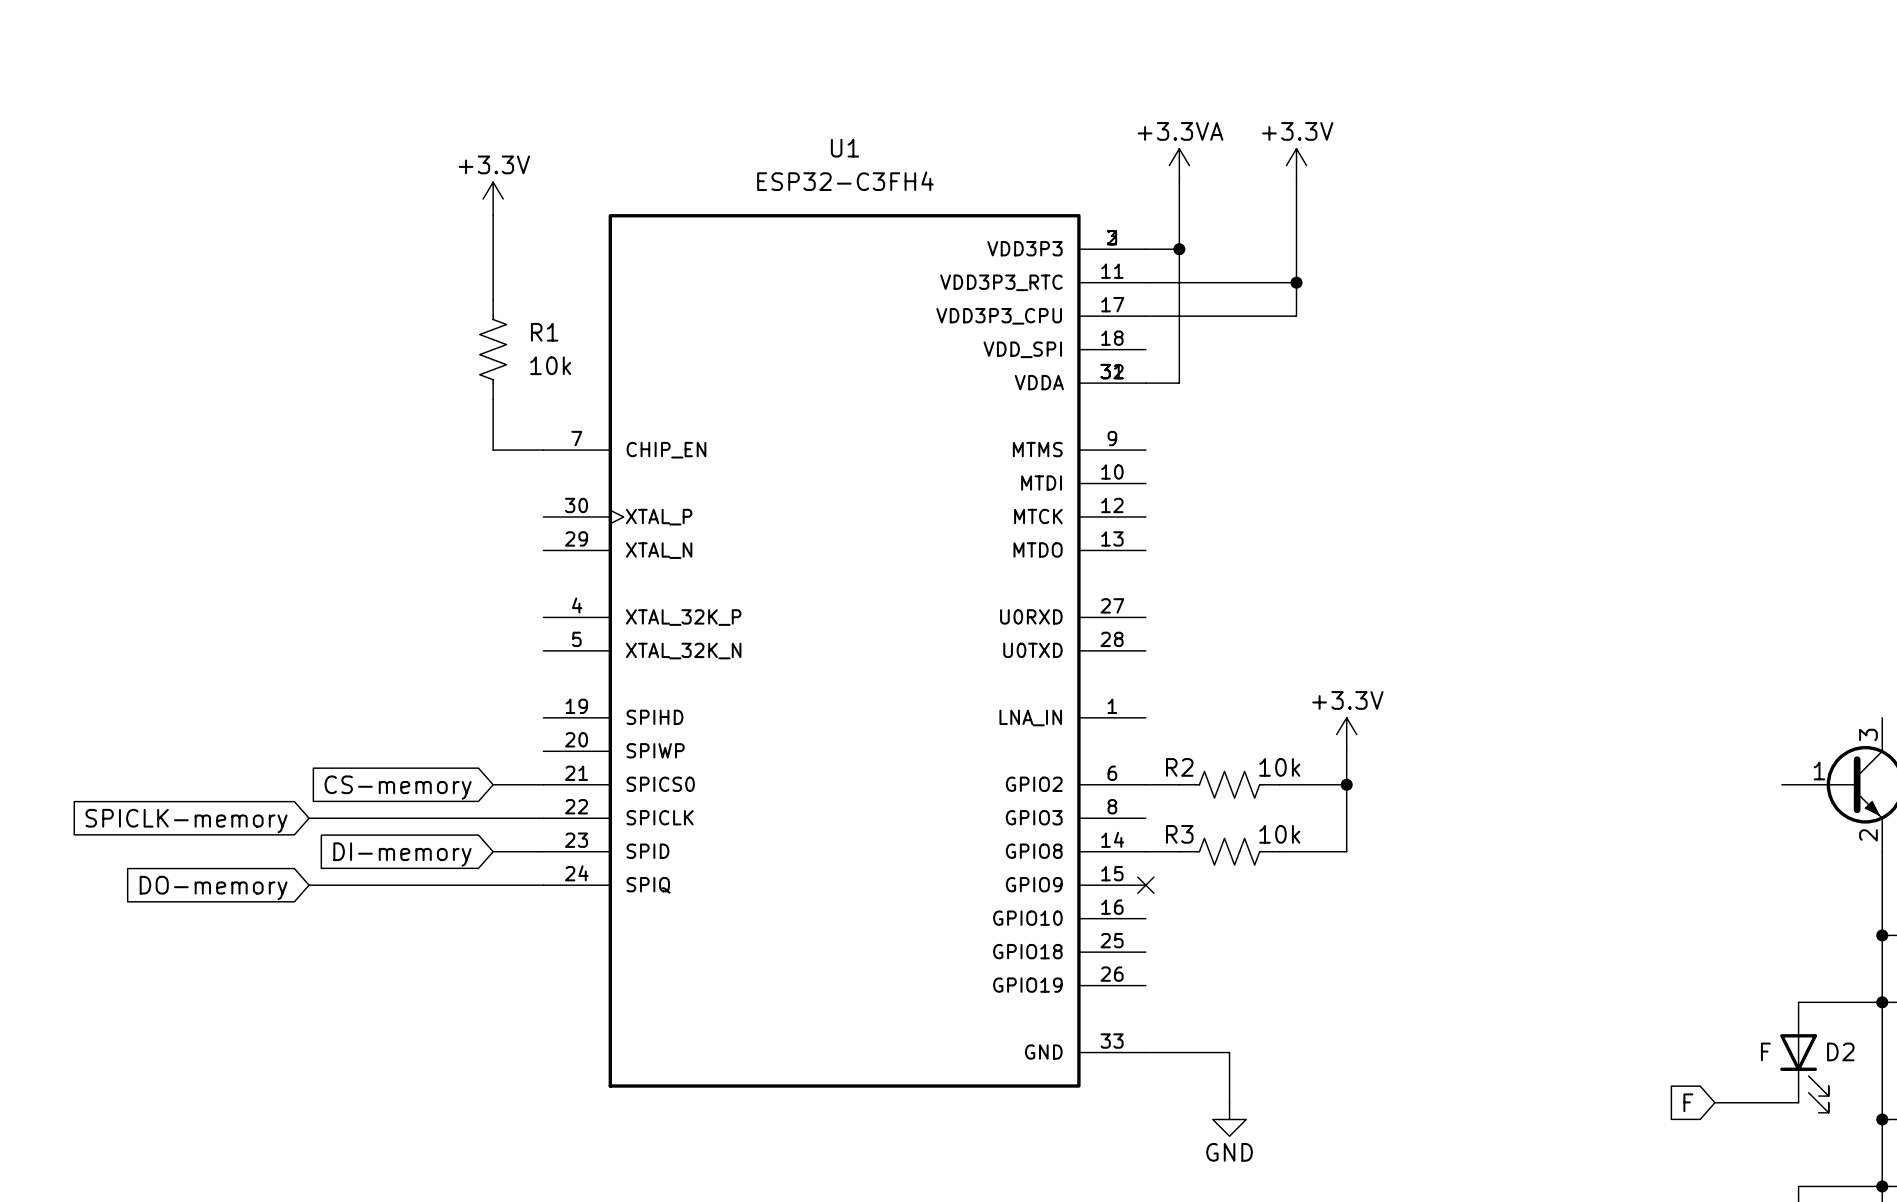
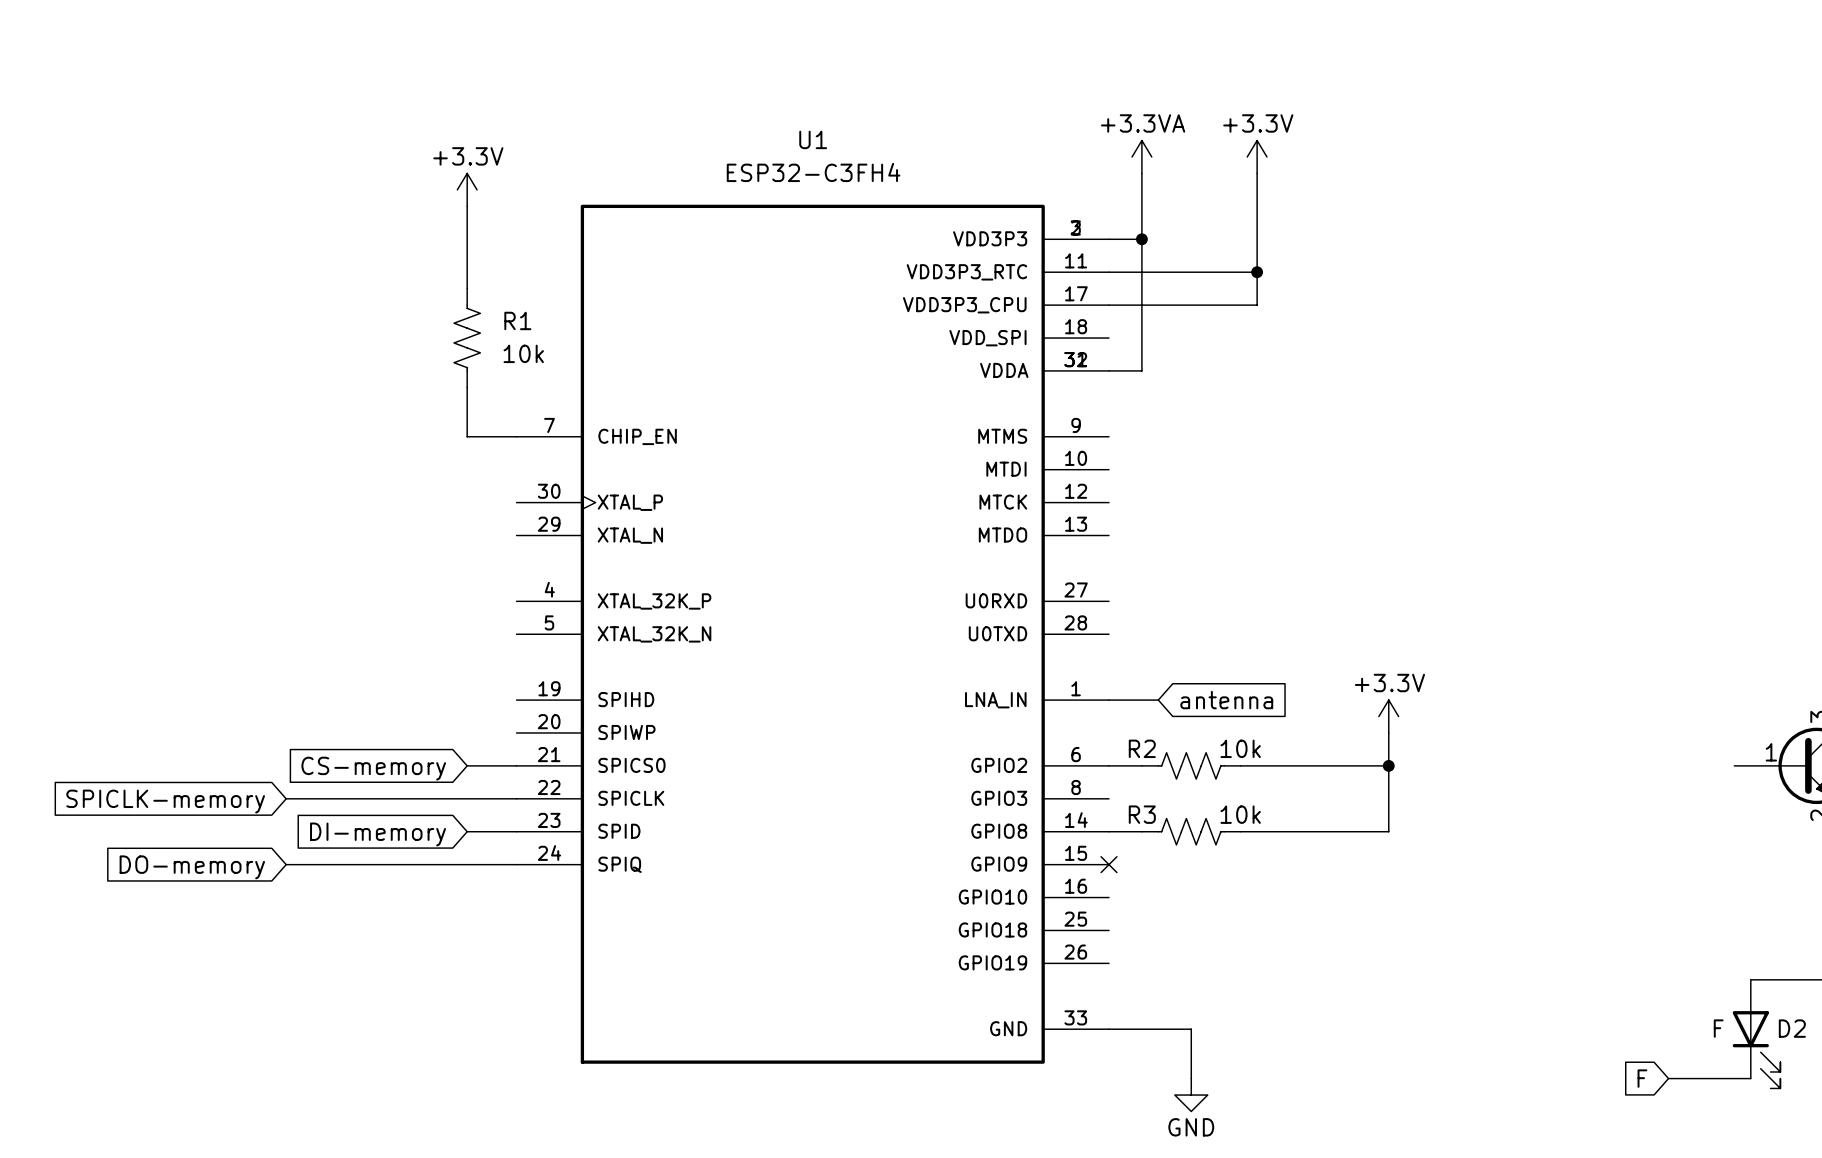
wire: none -> (1109, 700) (1158, 700)
global label: none -> antenna (1226, 700)
power symbol position: +3.3V (1346, 734) -> +3.3V (1388, 716)
wire: (1346, 751) (1346, 851) -> (1388, 732) (1388, 831) (1306, 831)
wire: none -> (1306, 765) (1388, 765)
junction: (1346, 784) -> none
junction: none -> (1388, 765)

